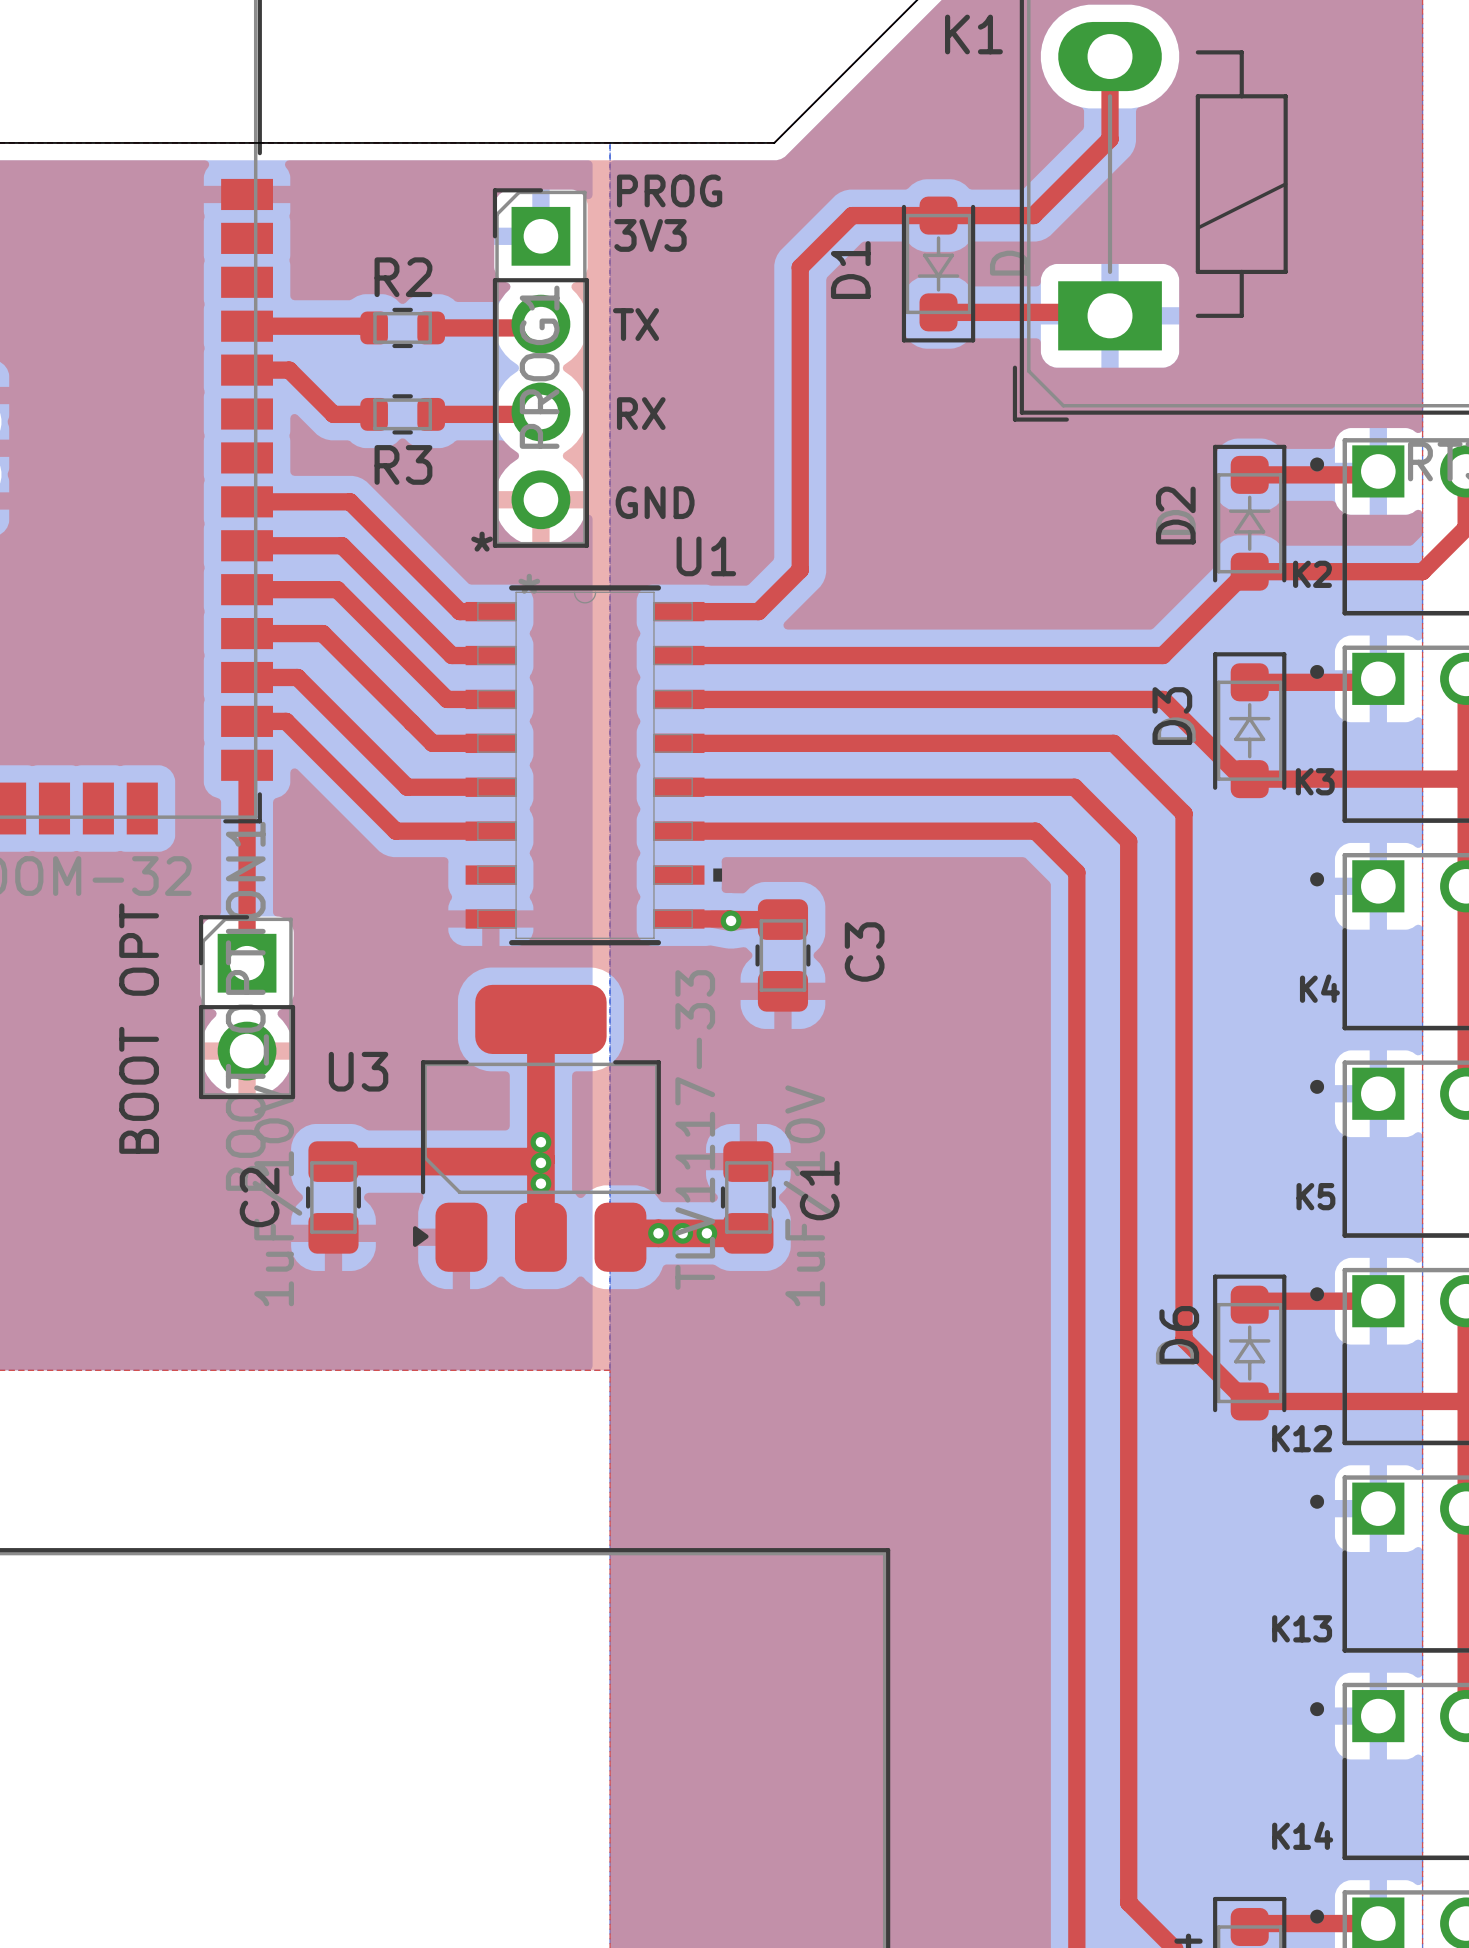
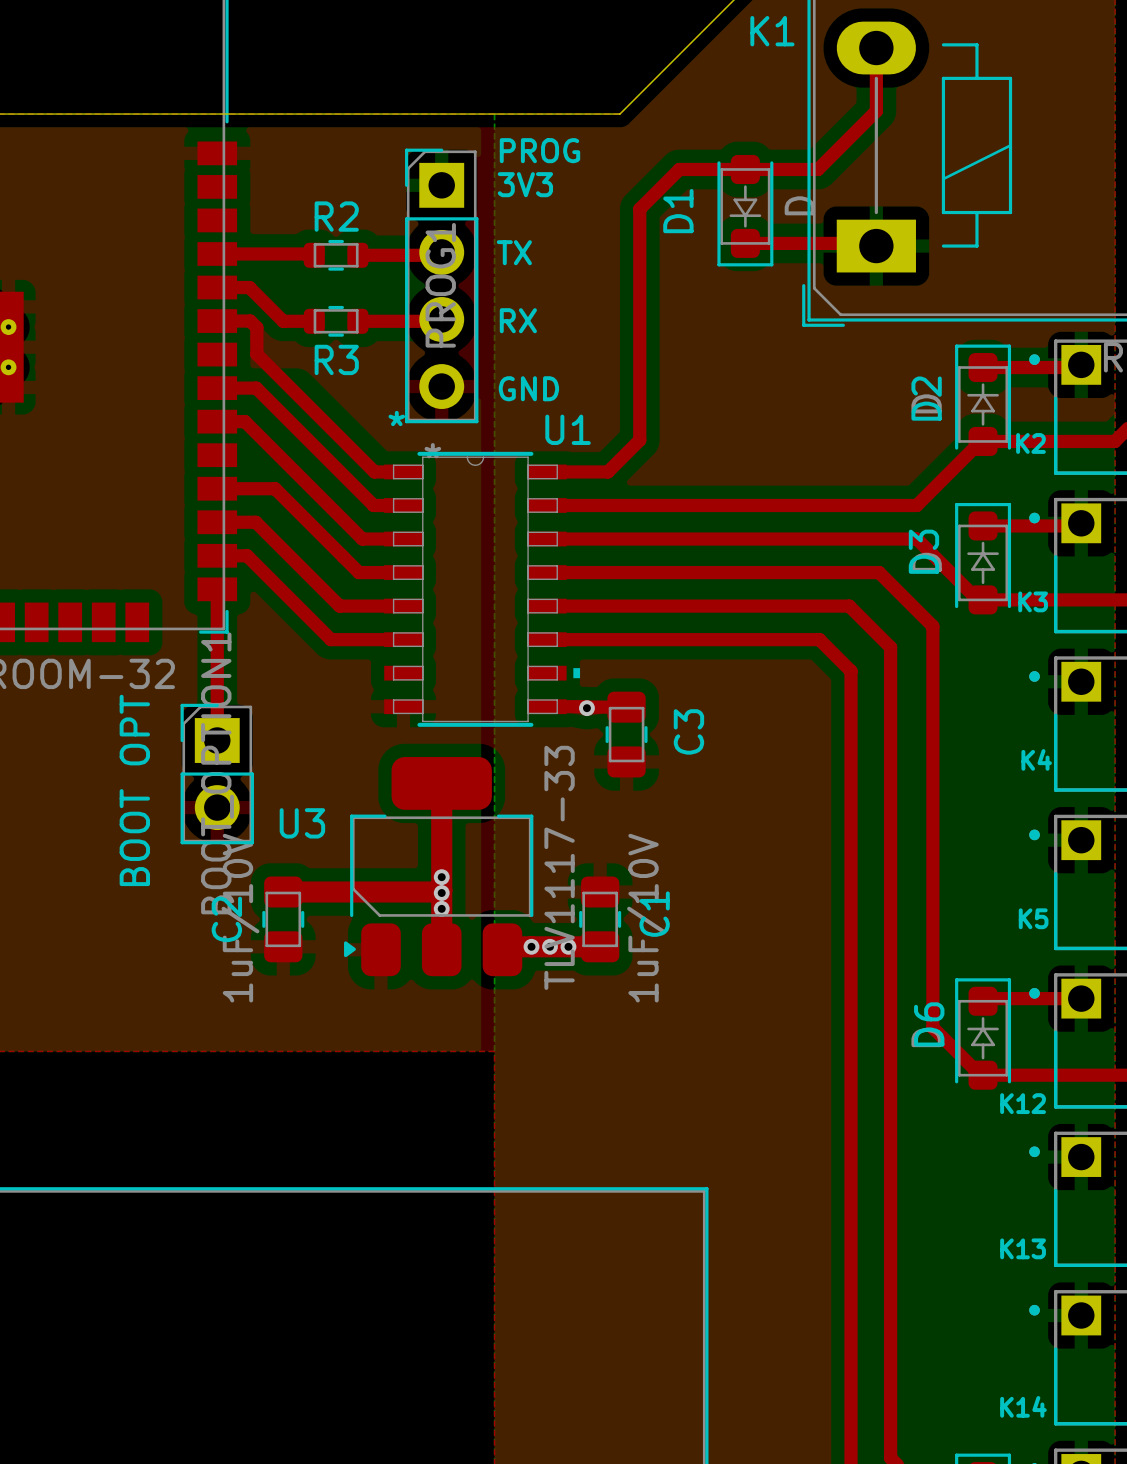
top track: (298, 501) (350, 501) (459, 611) -> (217, 321) (250, 321) (256, 327) (256, 354) (374, 471) (379, 471)
top track: (283, 545) (342, 545) -> (256, 388) (289, 421)
top track: (247, 589) (337, 589) (447, 699) -> (245, 421) (362, 539) (370, 539)

